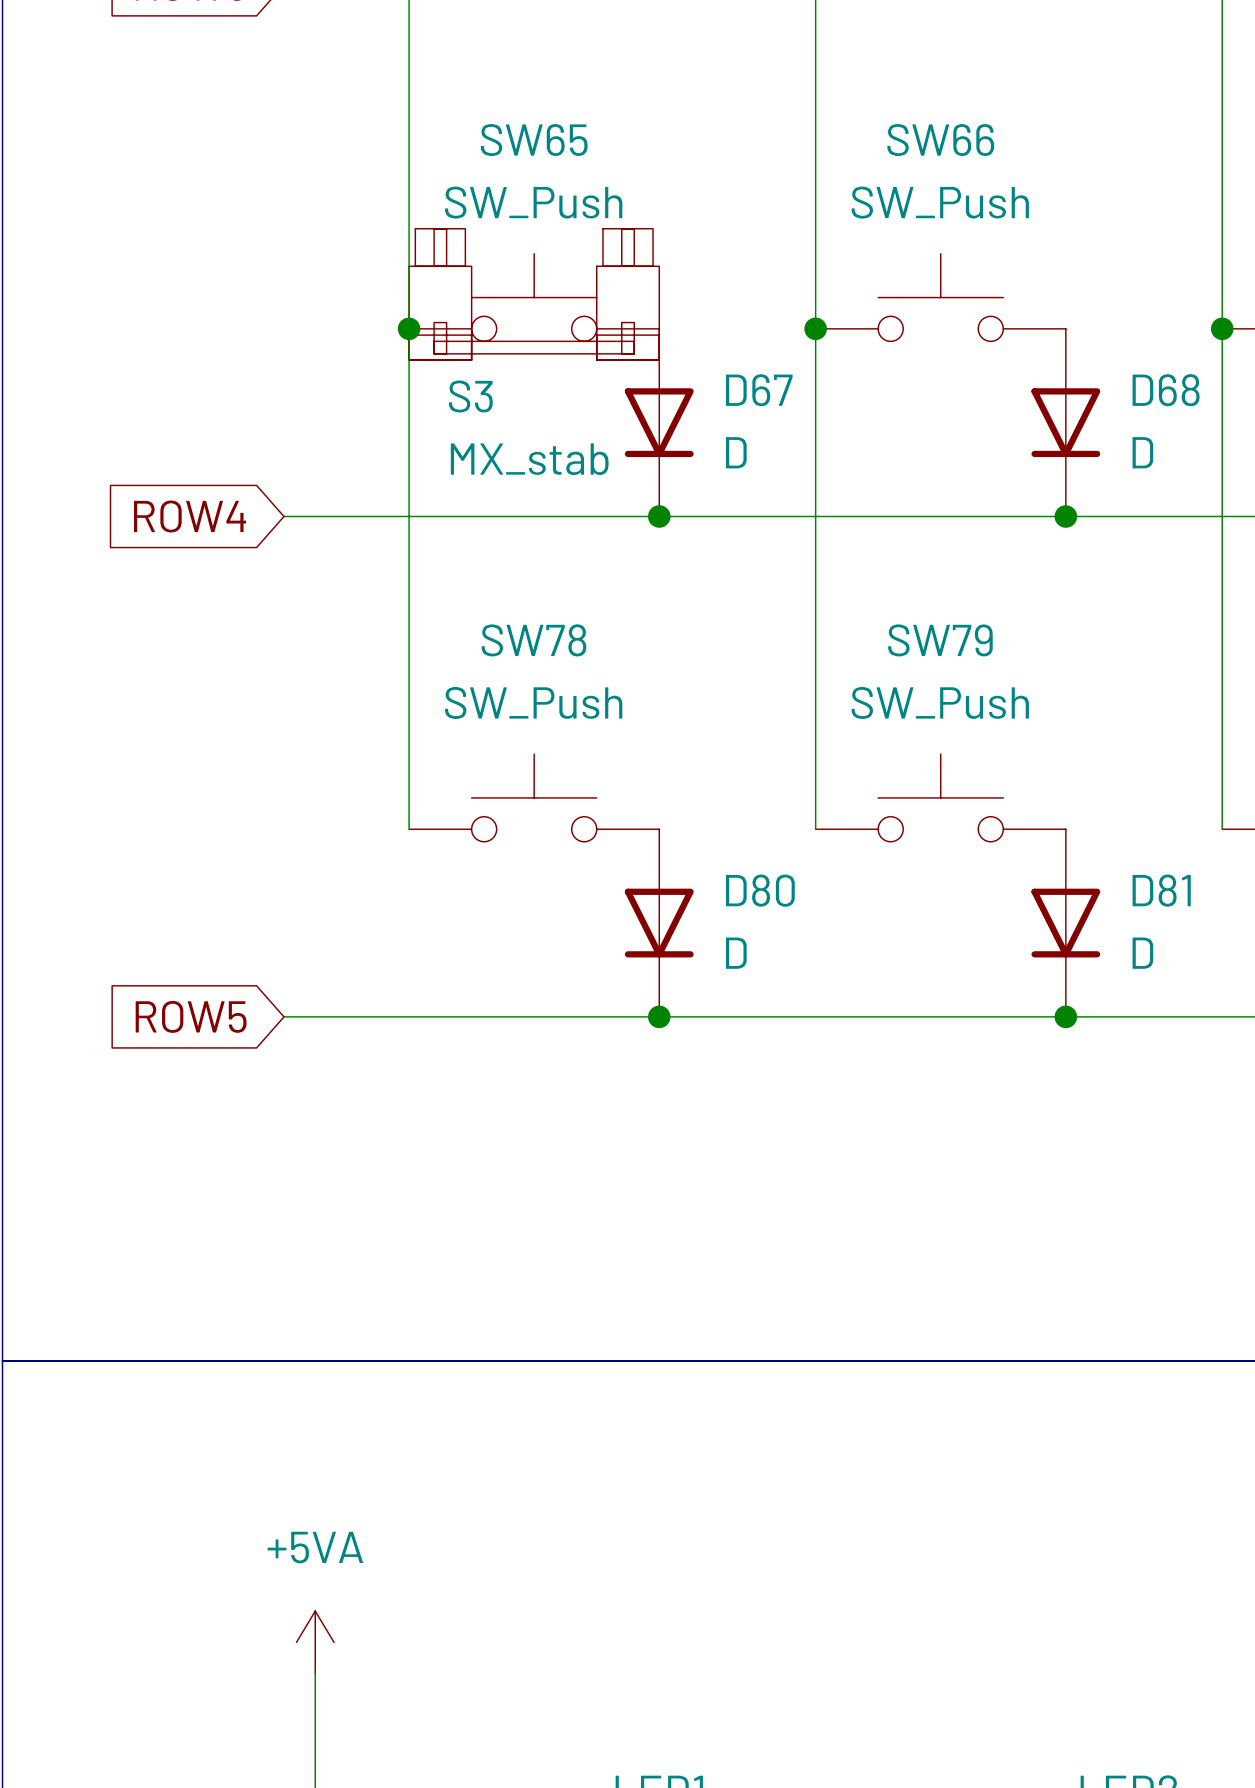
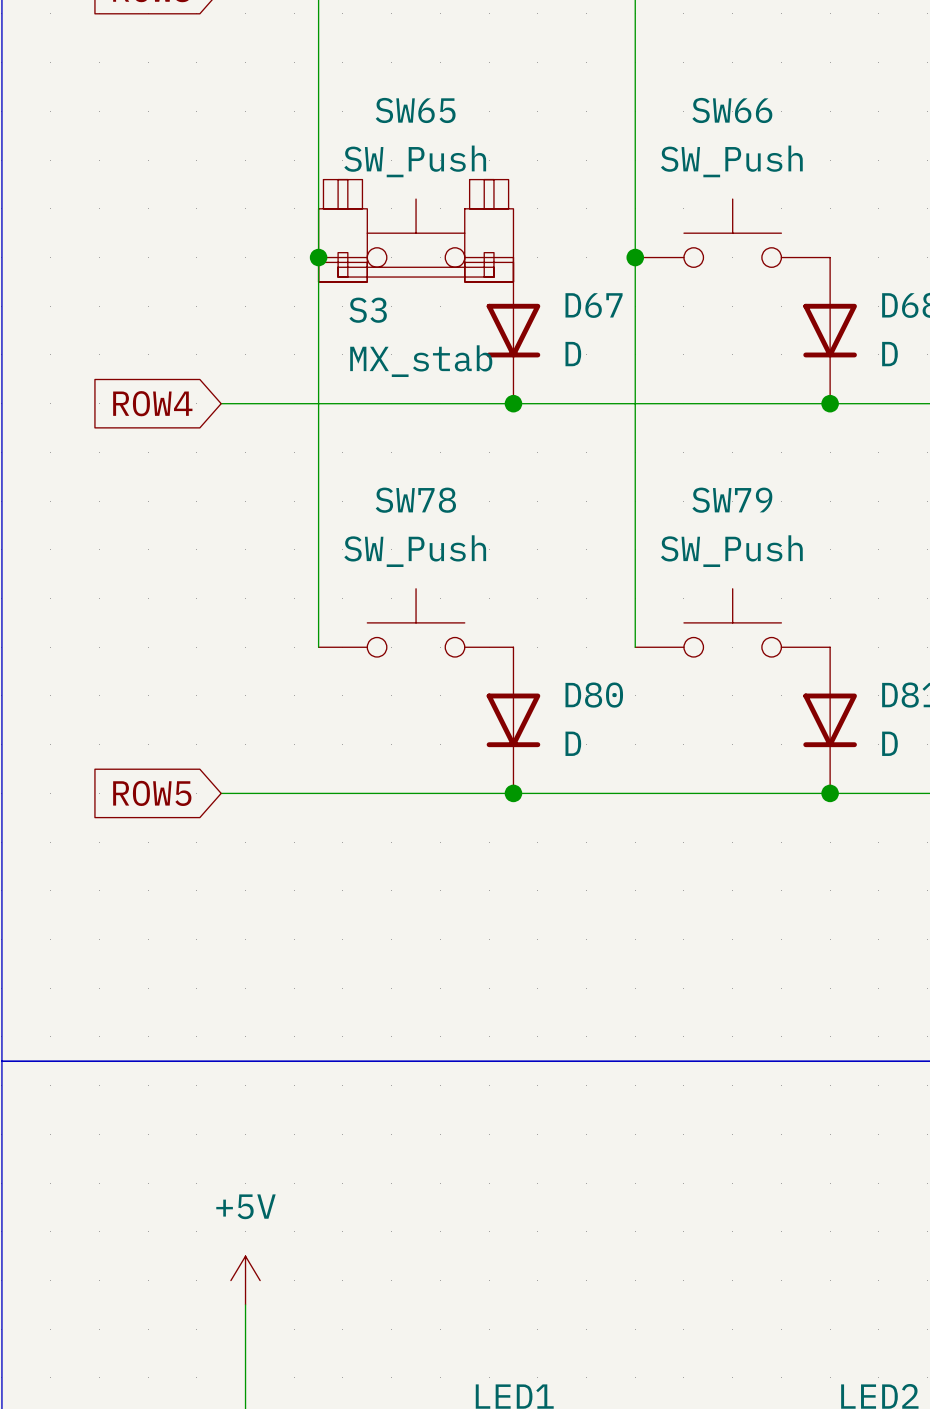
power symbol: +5VA (315, 1642) -> +5V (245, 1280)

